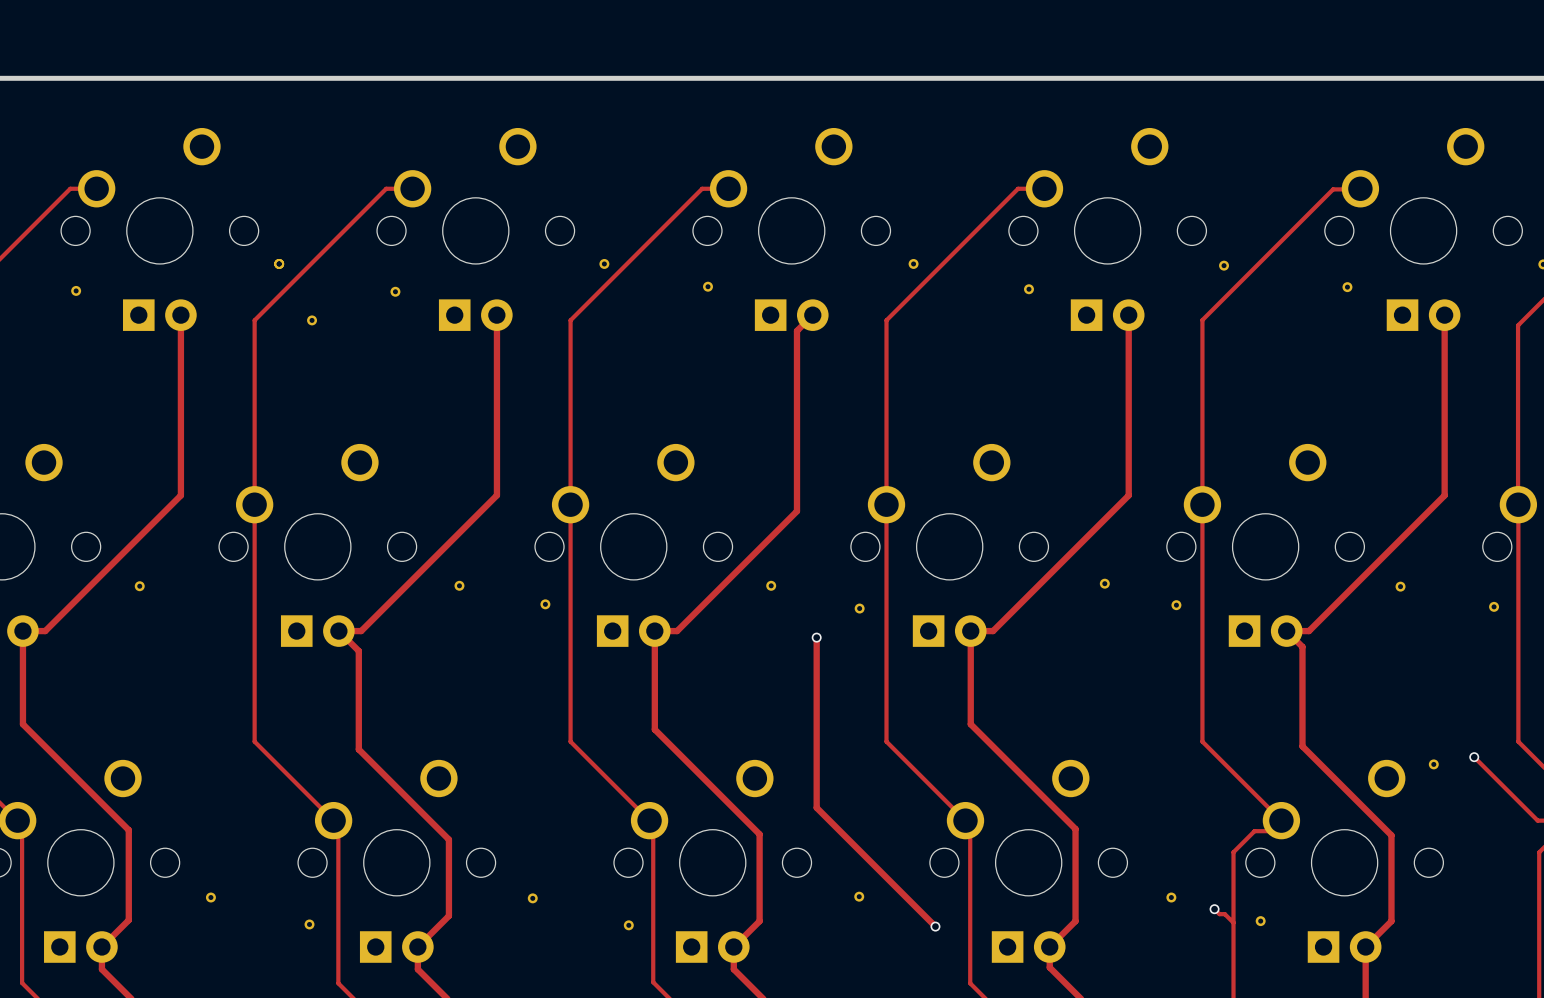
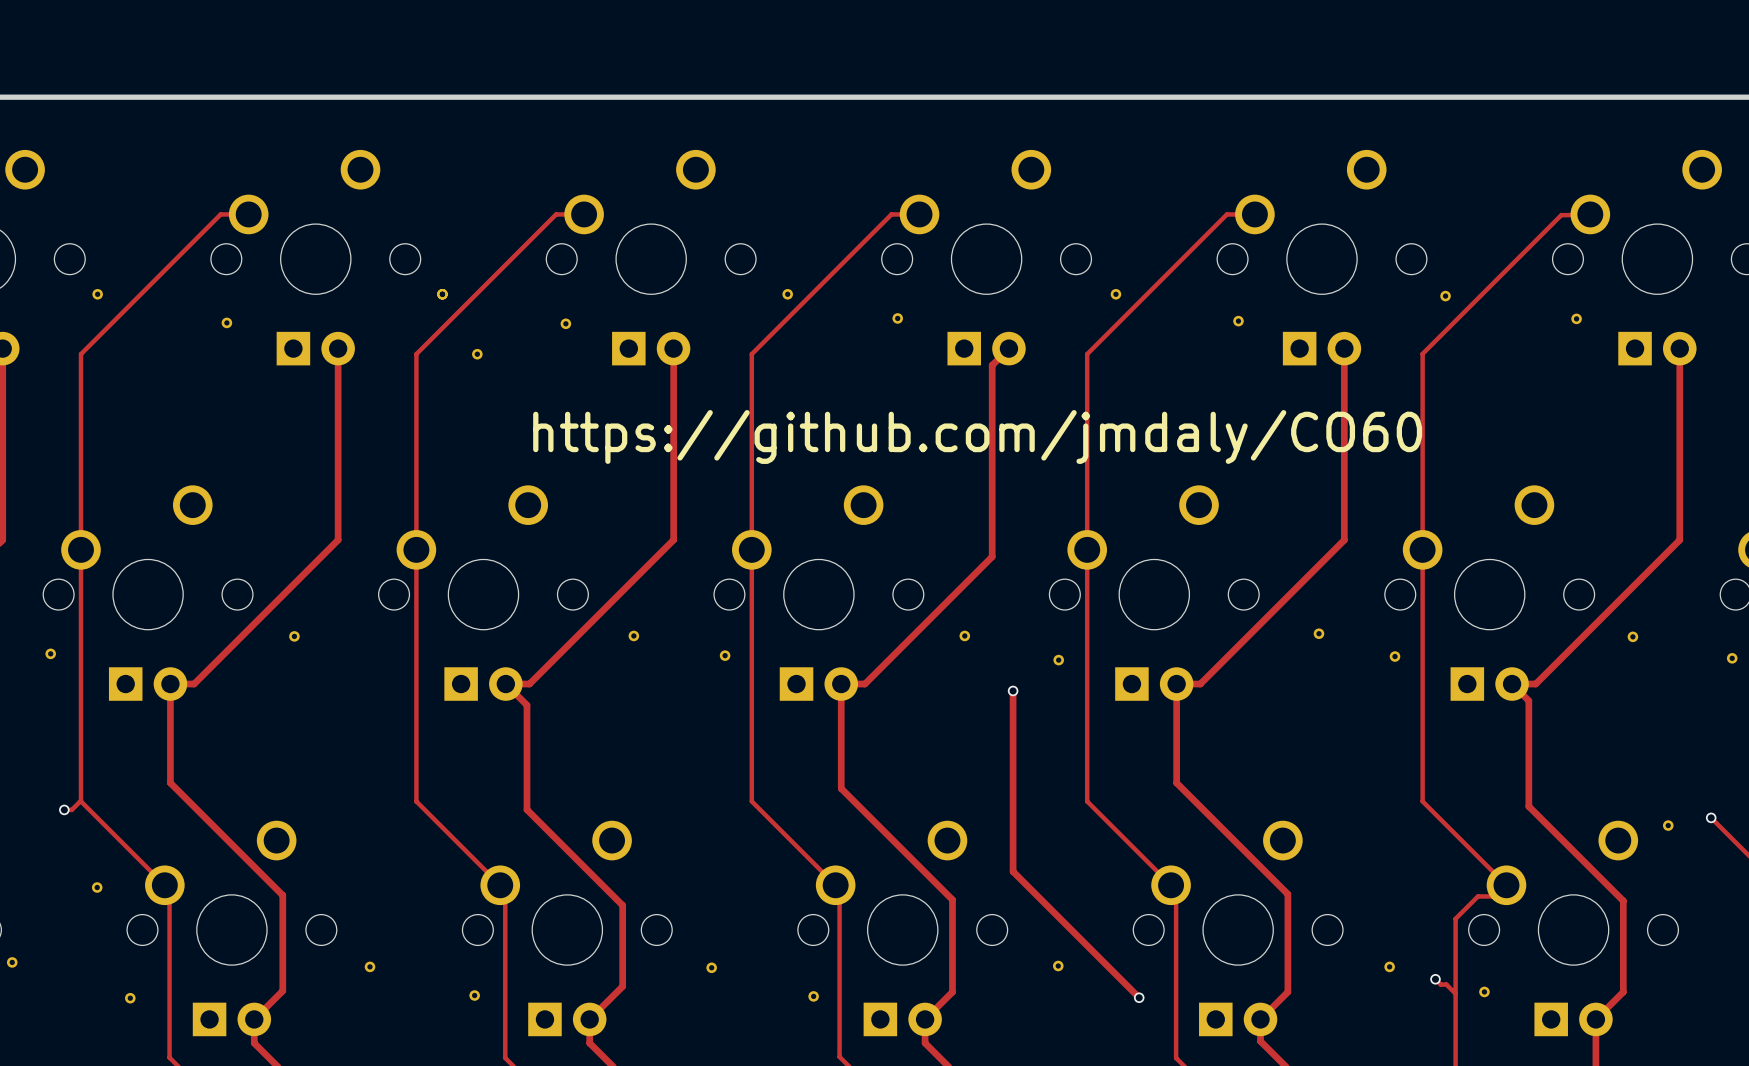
text: none -> https://github.com/jmdaly/CO60 (977, 436)

